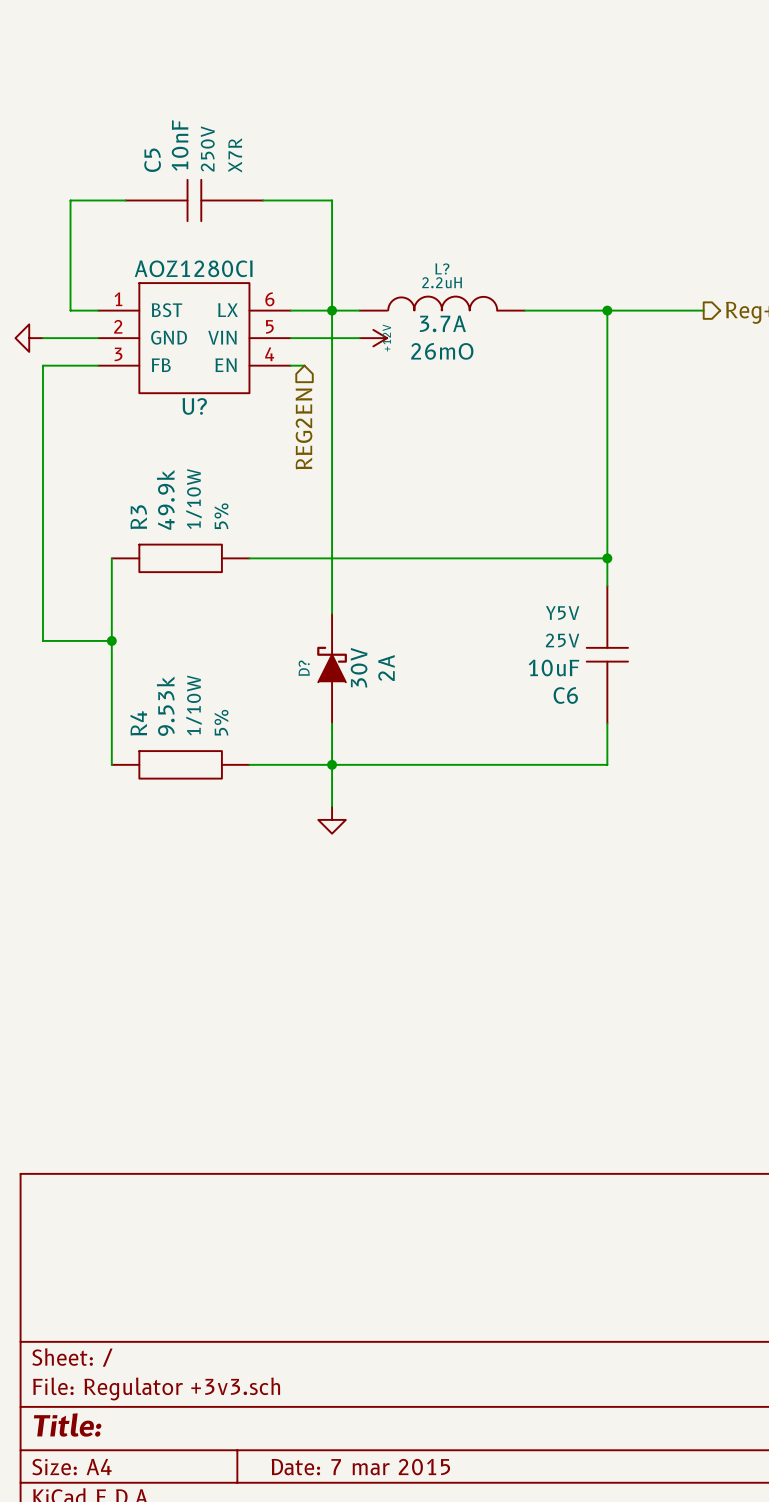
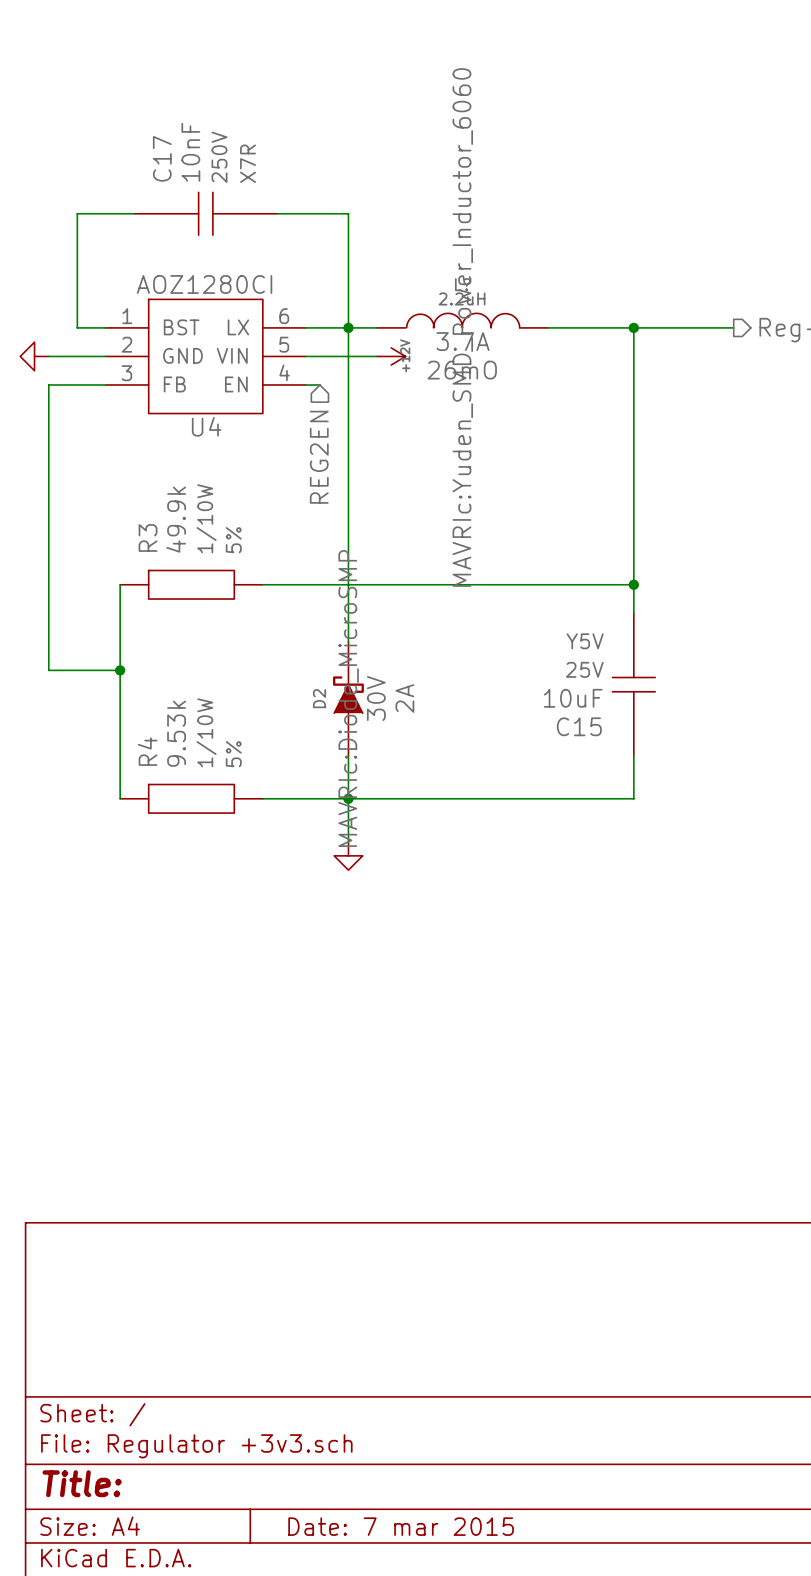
C5 name: C5 (152, 160) -> C17 (162, 158)
L? text: none -> MAVRIc:Yuden_SMD_Power_Inductor_6060 (462, 327)
U? name: U? (194, 406) -> U4 (206, 426)
D? name: D? (304, 668) -> D2 (319, 698)
D? text: none -> MAVRIc:Diode_MicroSMP (348, 698)
C6 name: C6 (565, 695) -> C15 (579, 726)

